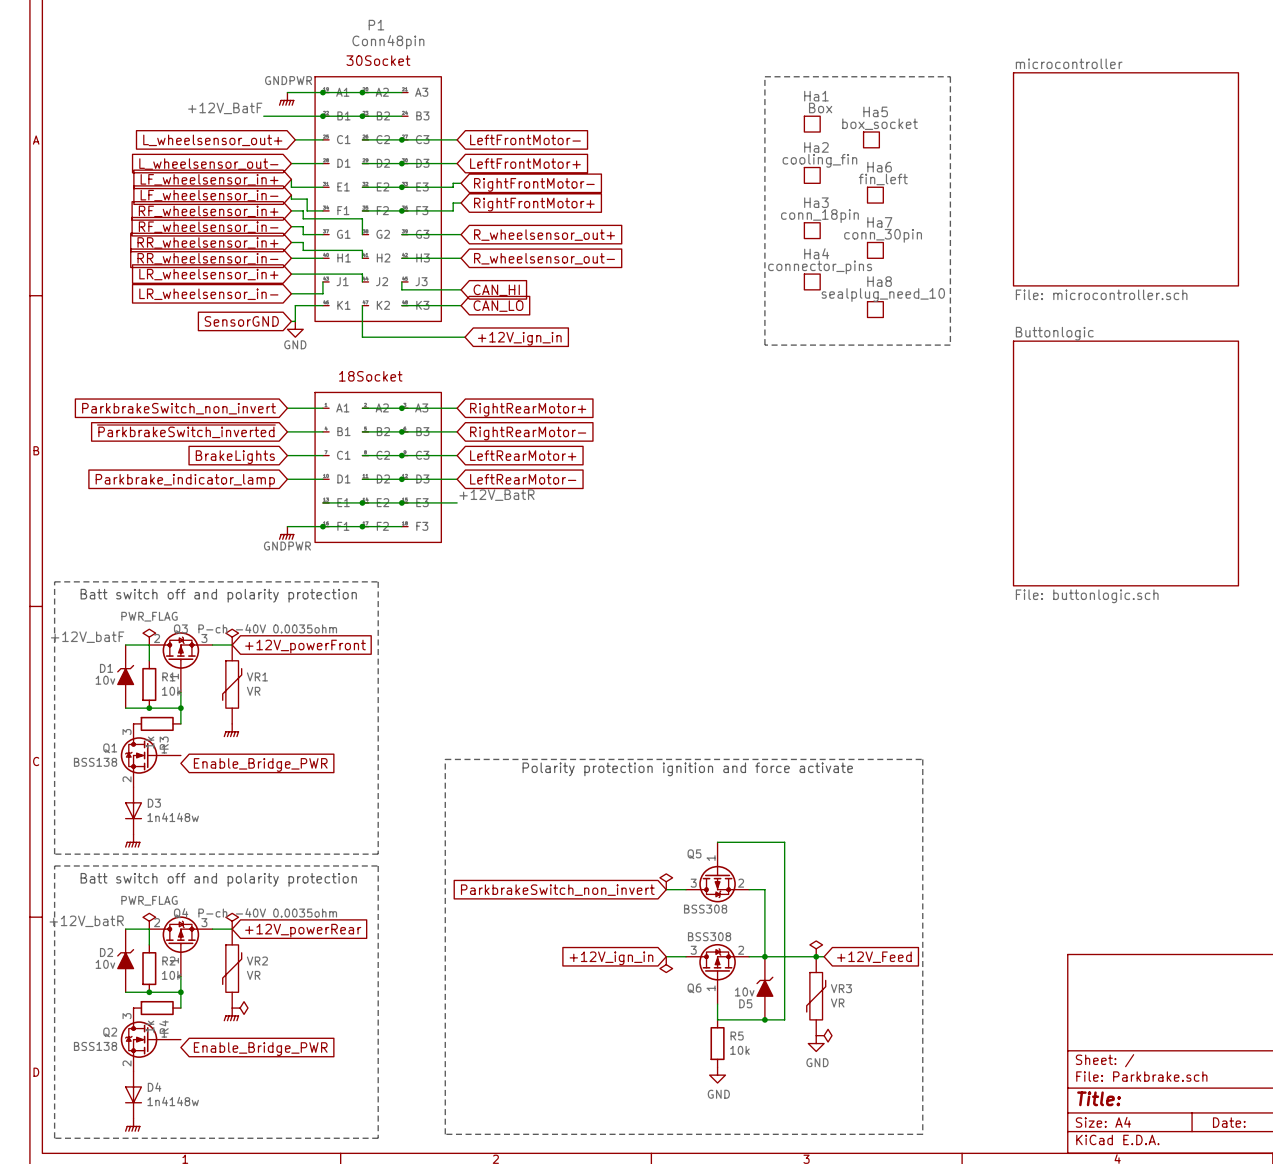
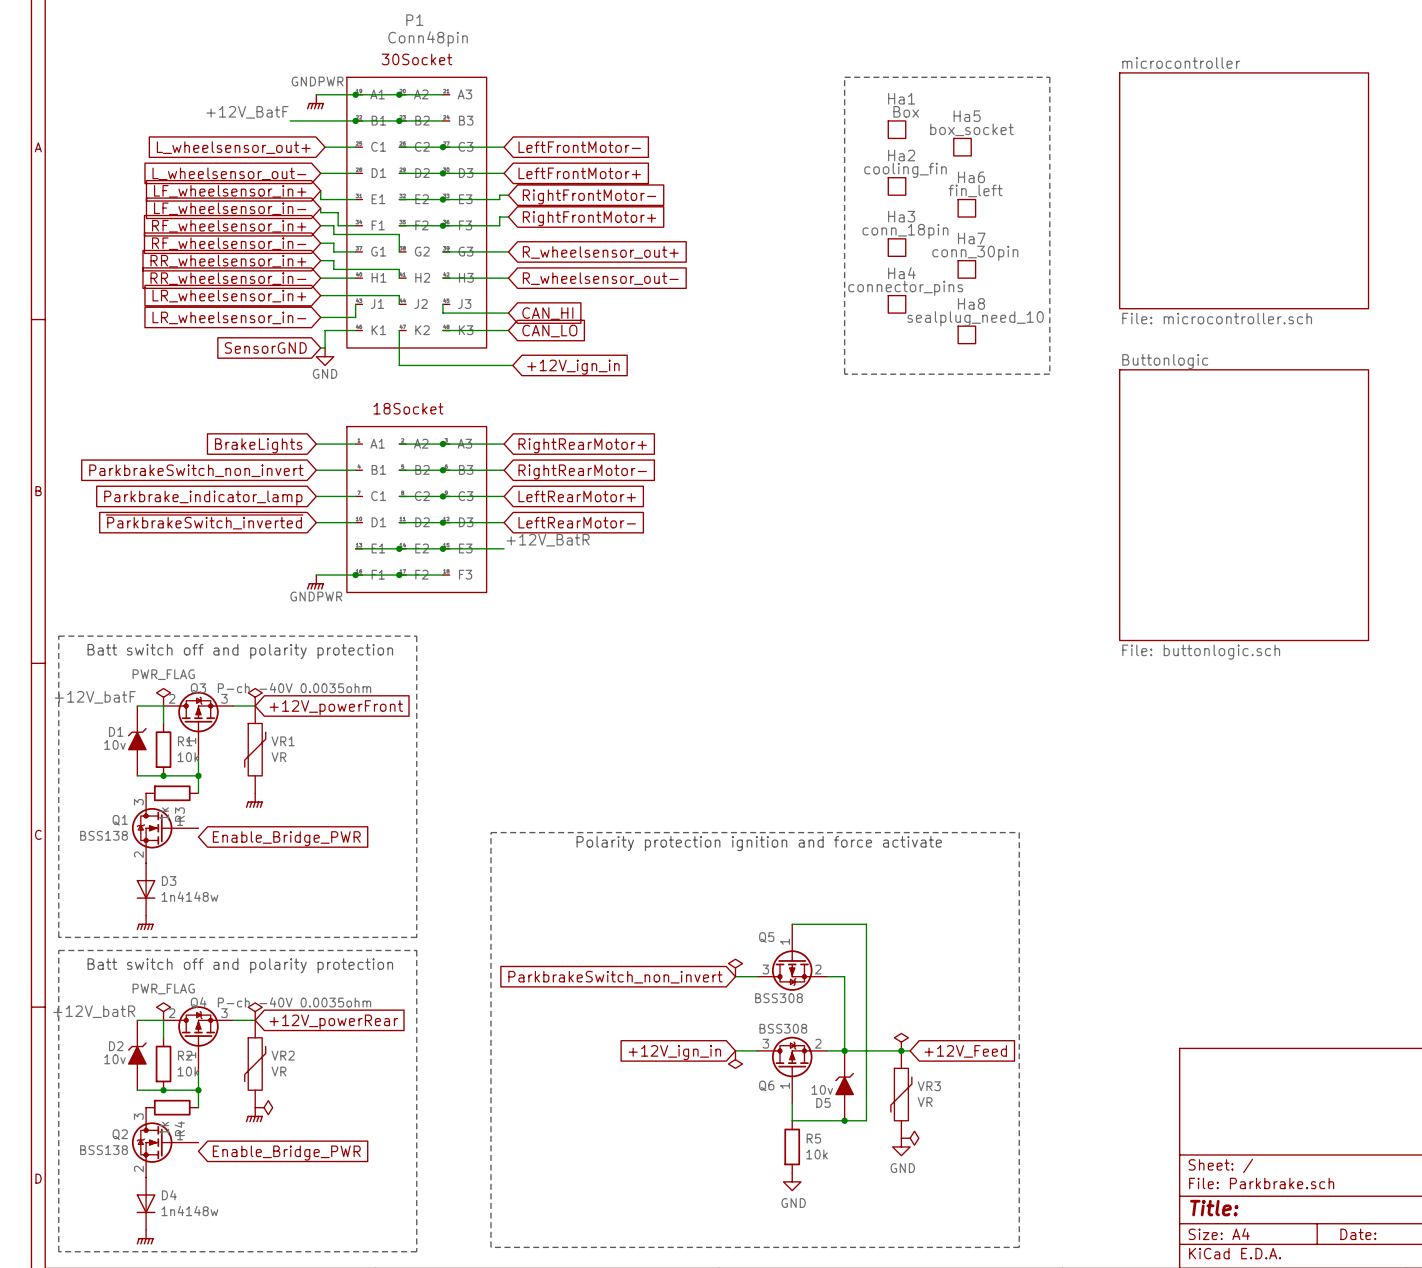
global label: ParkbrakeSwitch_non_invert (178, 408) -> BrakeLights (258, 445)
global label: ~{ParkbrakeSwitch_inverted} (186, 431) -> ParkbrakeSwitch_non_invert (196, 470)
global label: BrakeLights (235, 457) -> Parkbrake_indicator_lamp (203, 498)
global label: Parkbrake_indicator_lamp (185, 480) -> ~{ParkbrakeSwitch_inverted} (204, 521)

